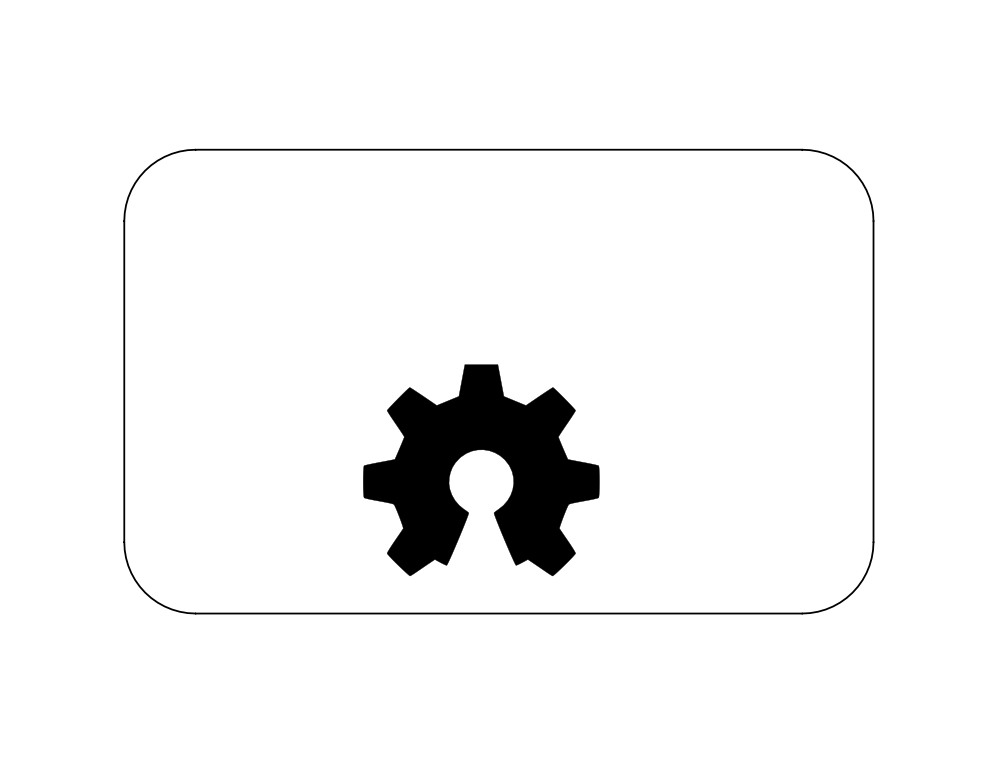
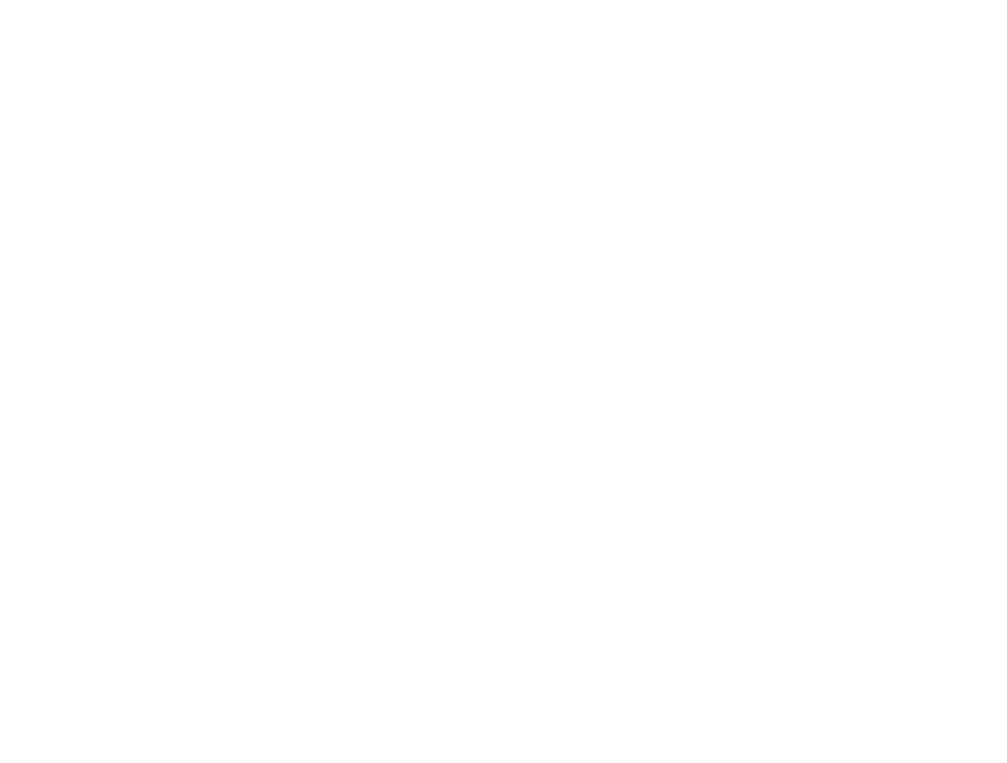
board edge: (195, 149) (802, 149) (818, 151) (840, 160) (852, 170) (862, 183) (869, 197) (873, 221) (873, 542) (869, 565) (862, 580) (852, 592) (833, 606) (818, 611) (802, 613) (195, 613) (172, 609) (157, 602) (145, 592) (135, 580) (128, 565) (124, 550) (124, 213) (131, 190) (145, 170) (164, 156) (179, 151) (195, 149) -> none
drawing: [363, 364, 600, 577] -> none

